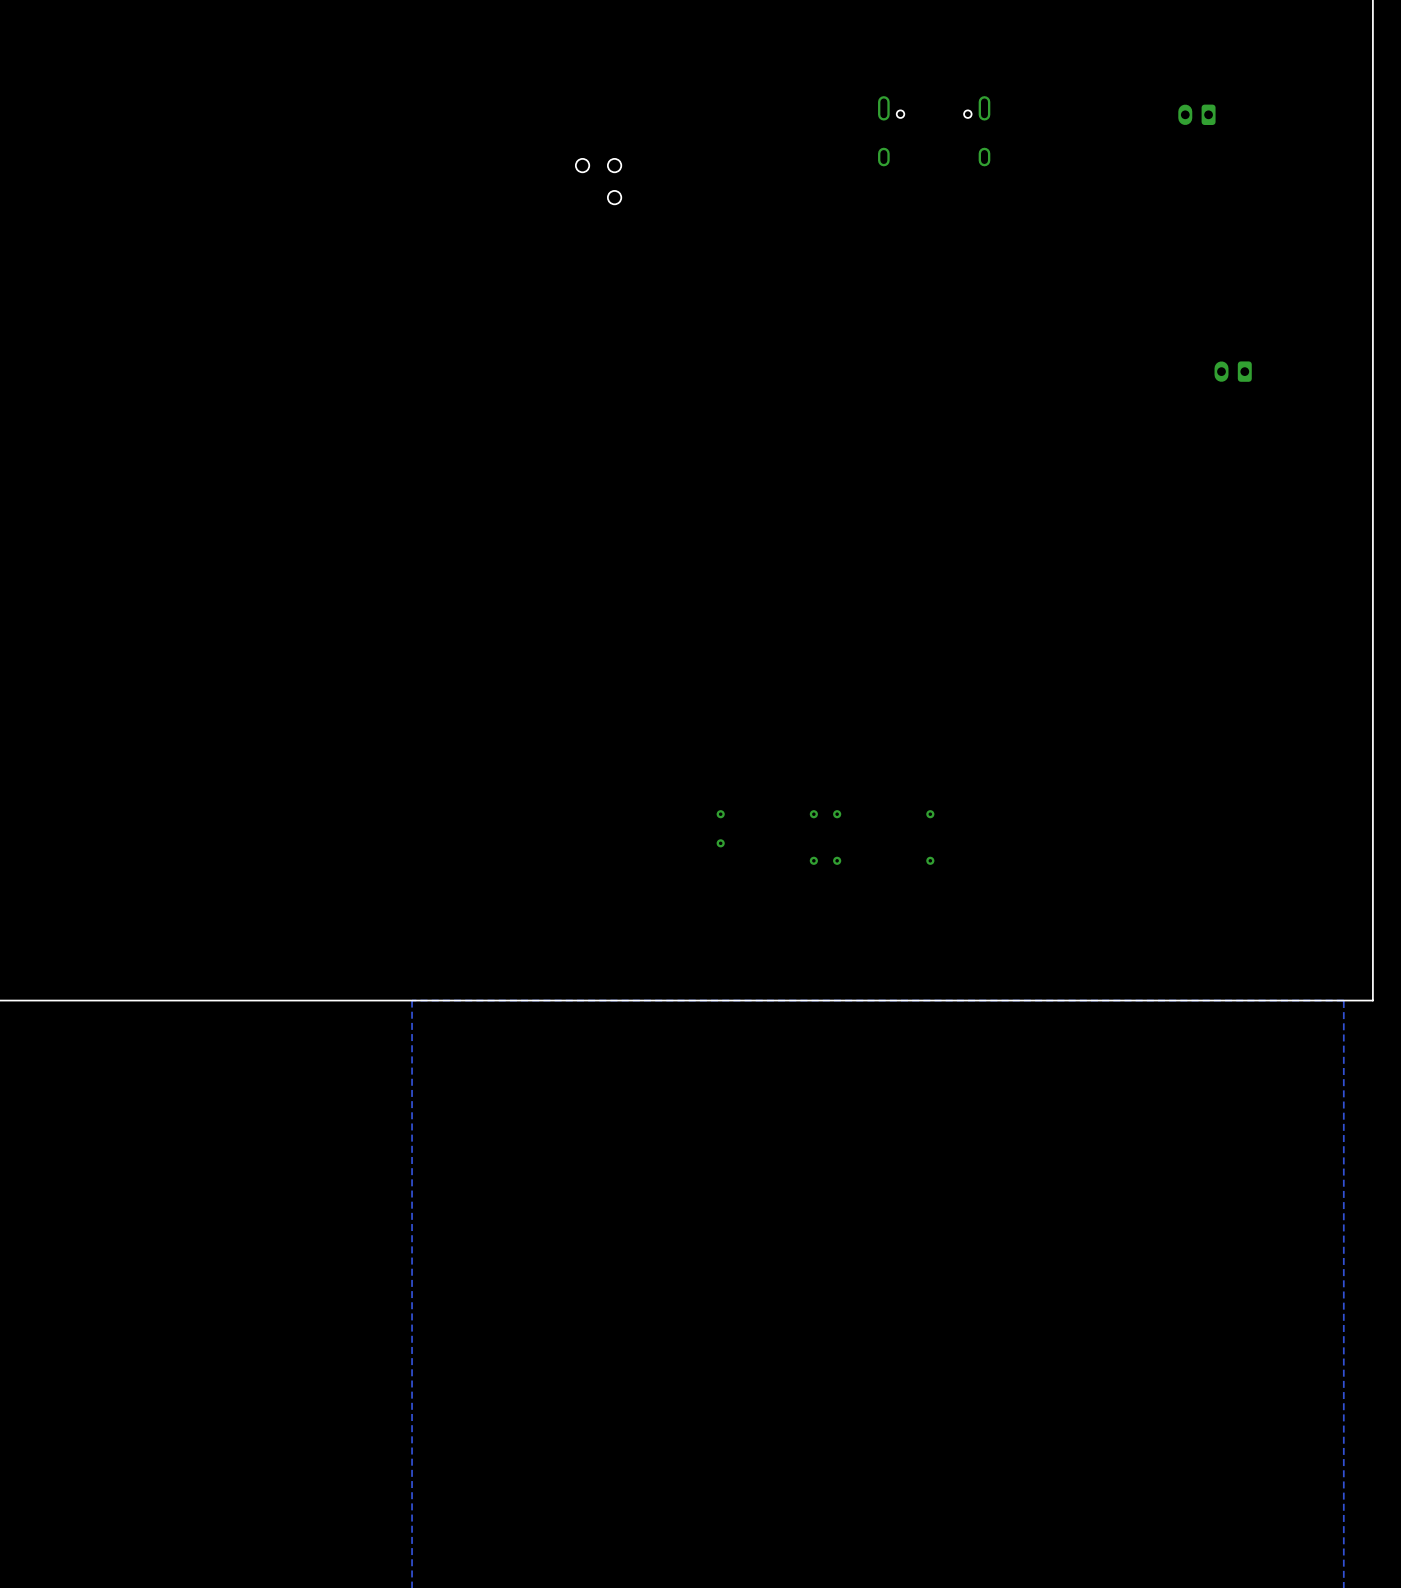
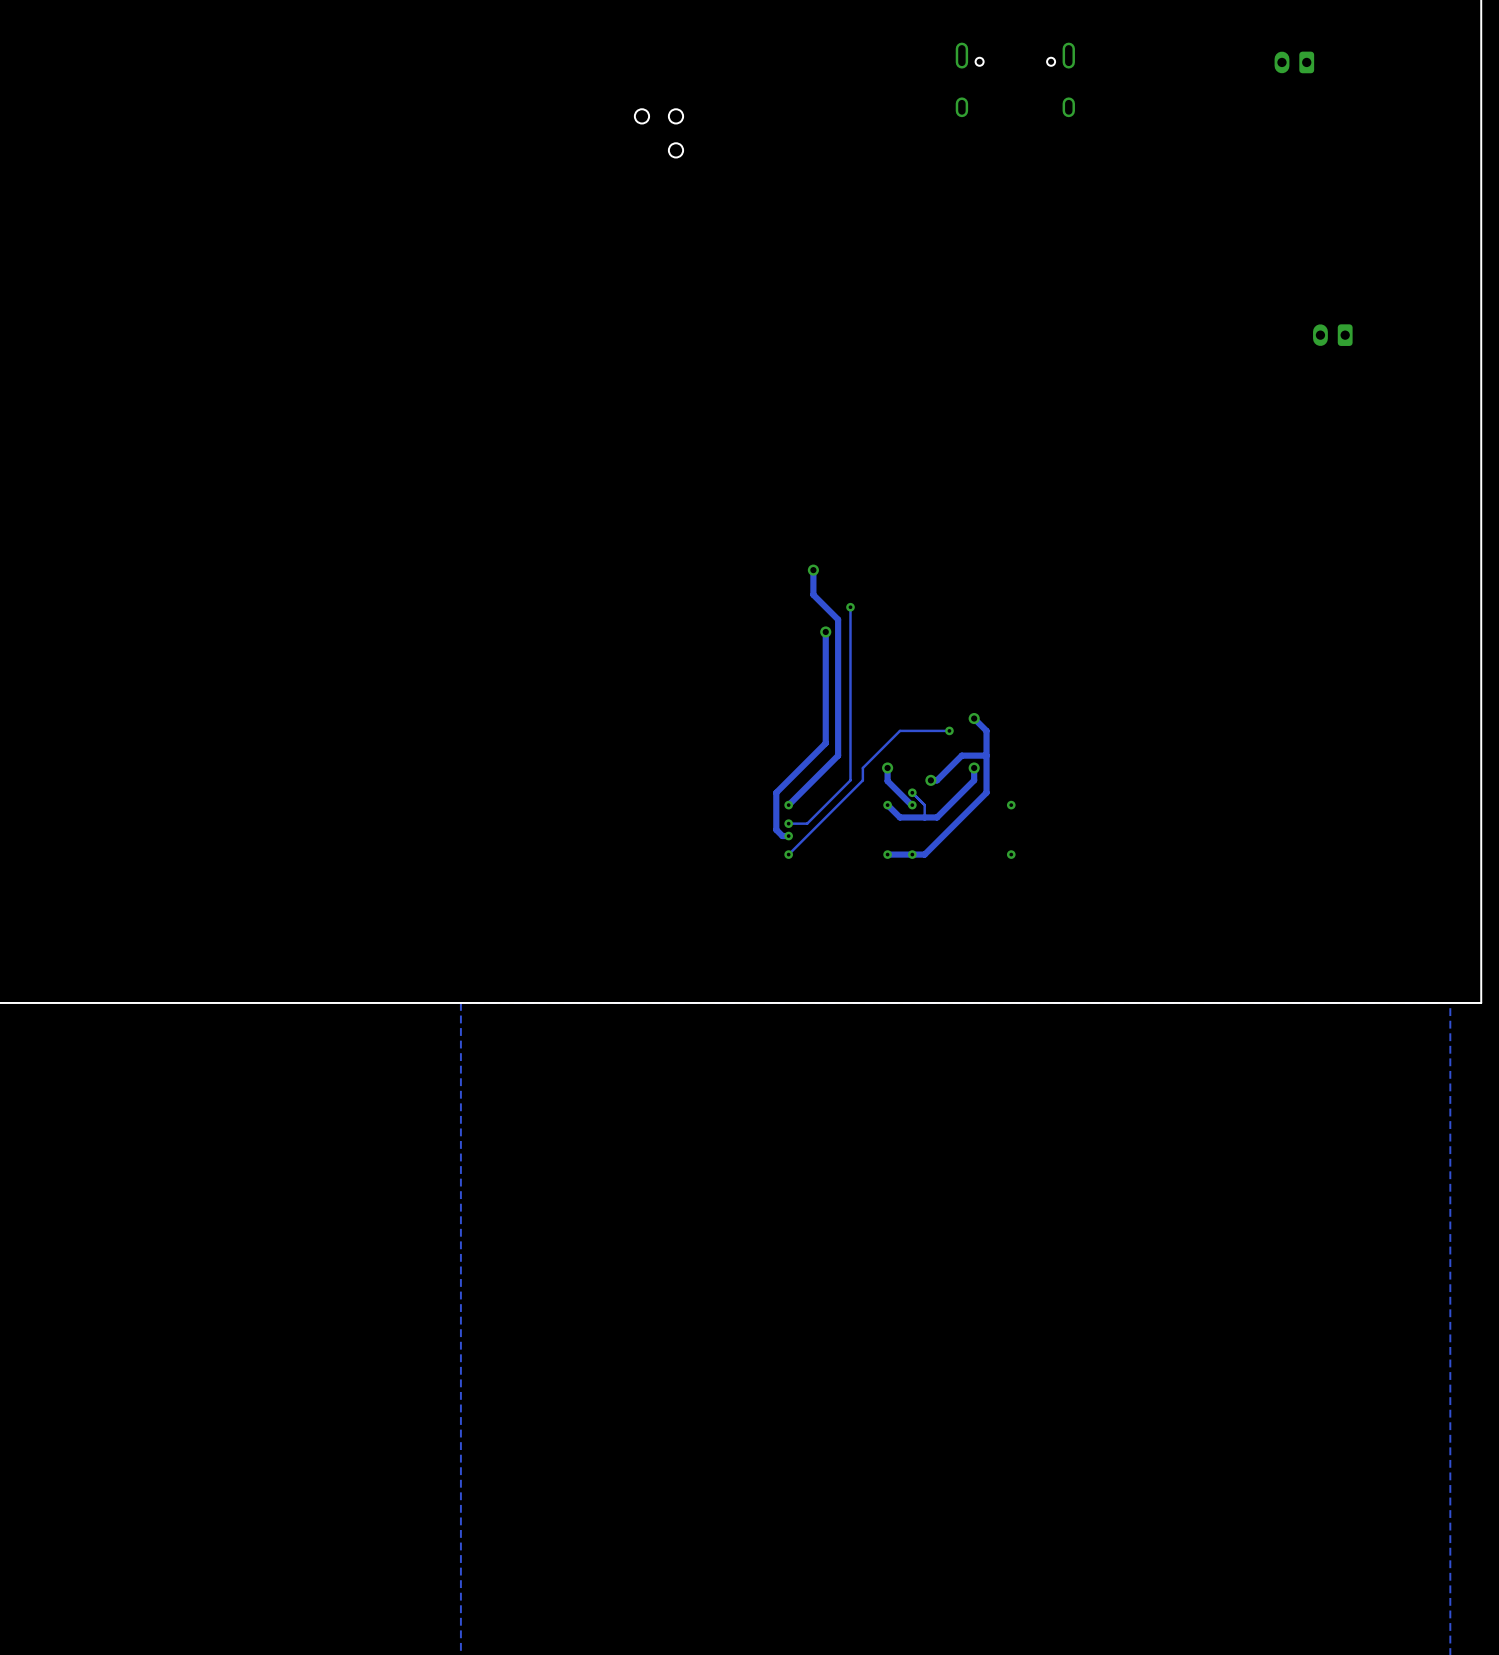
track: none -> (813, 570) (813, 594) (838, 619) (838, 755) (788, 805)
via: none -> (813, 570)
track: none -> (850, 607) (850, 780) (807, 823) (788, 823)
via: none -> (850, 607)
track: none -> (825, 631) (825, 743) (776, 792) (776, 829) (782, 836) (788, 836)
via: none -> (825, 631)
track: none -> (974, 718) (986, 730) (986, 792) (924, 854) (887, 854)
via: none -> (974, 718)
track: none -> (949, 730) (899, 730) (862, 768) (862, 780) (788, 854)
via: none -> (949, 730)
track: none -> (986, 755) (961, 755) (937, 780) (930, 780)
track: none -> (887, 768) (887, 781) (912, 805)
via: none -> (887, 768)
track: none -> (974, 768) (974, 780) (937, 817) (899, 817) (887, 805)
via: none -> (974, 768)
via: none -> (930, 780)
track: none -> (912, 792) (924, 805) (924, 817)
via: none -> (912, 792)
via: none -> (788, 823)
via: none -> (788, 854)

